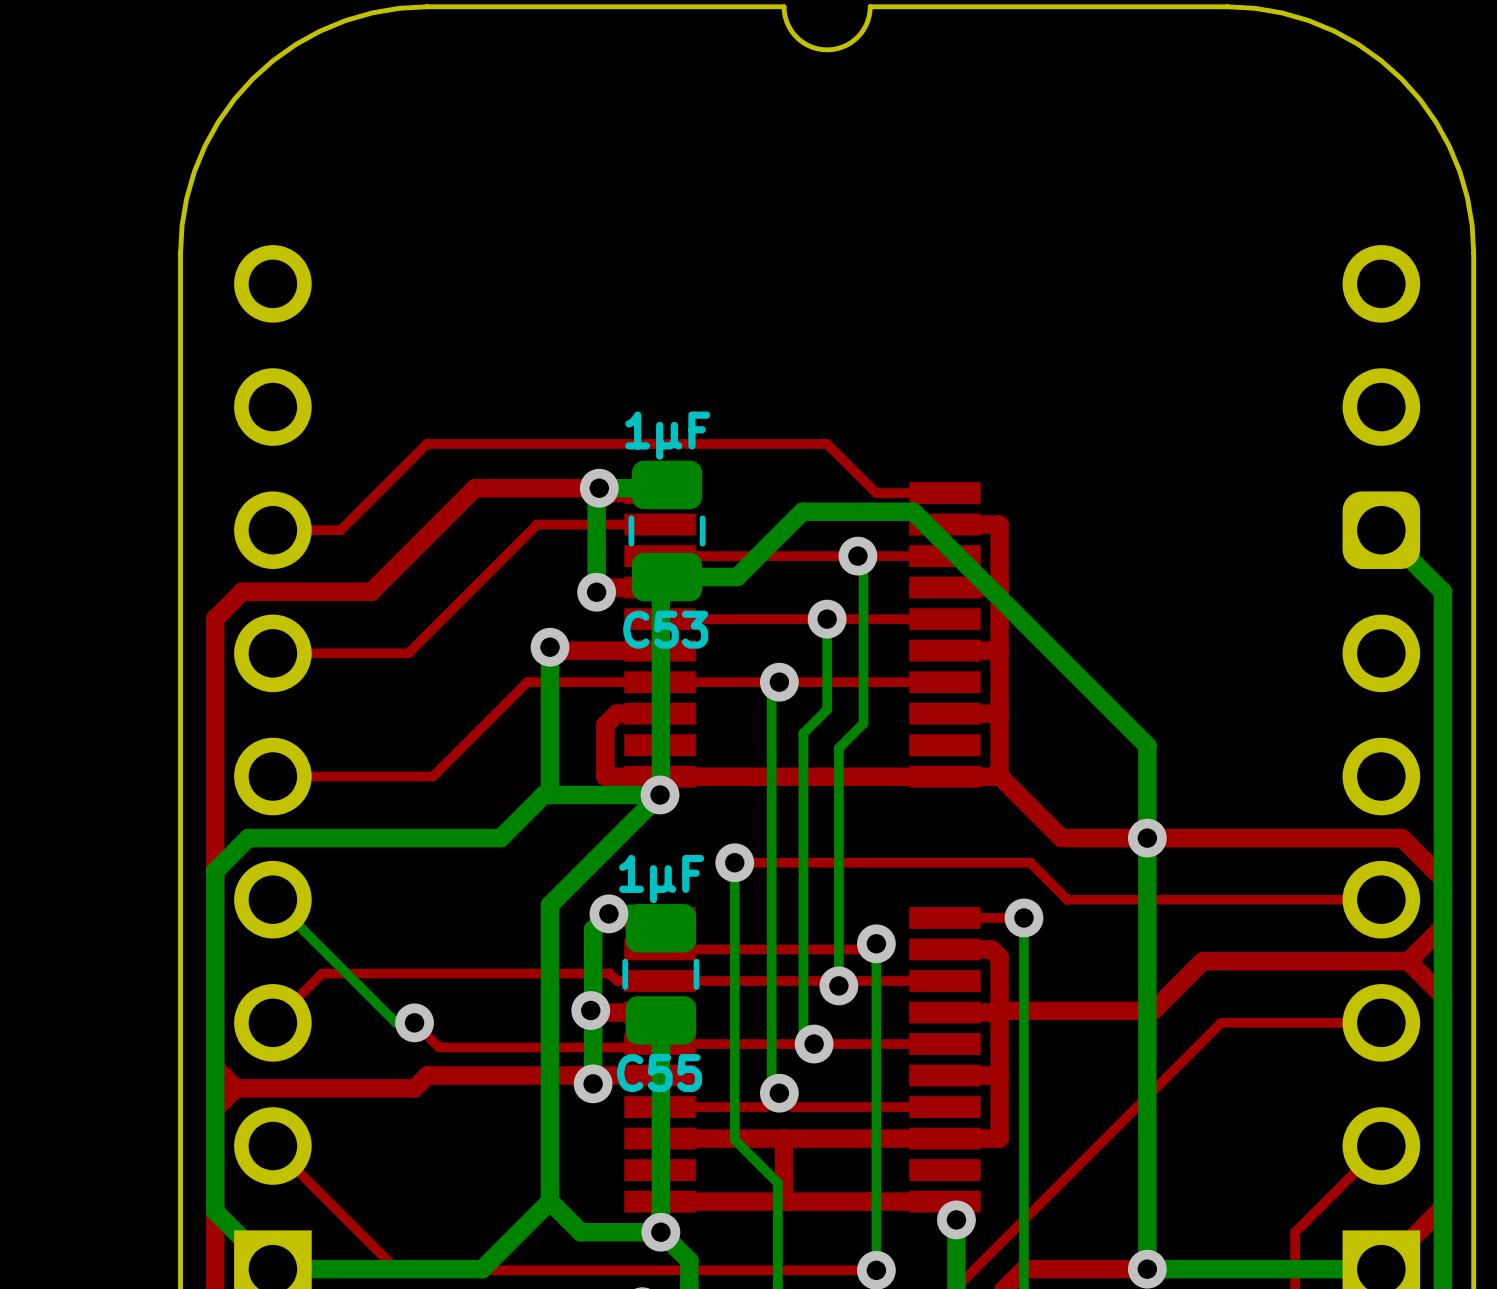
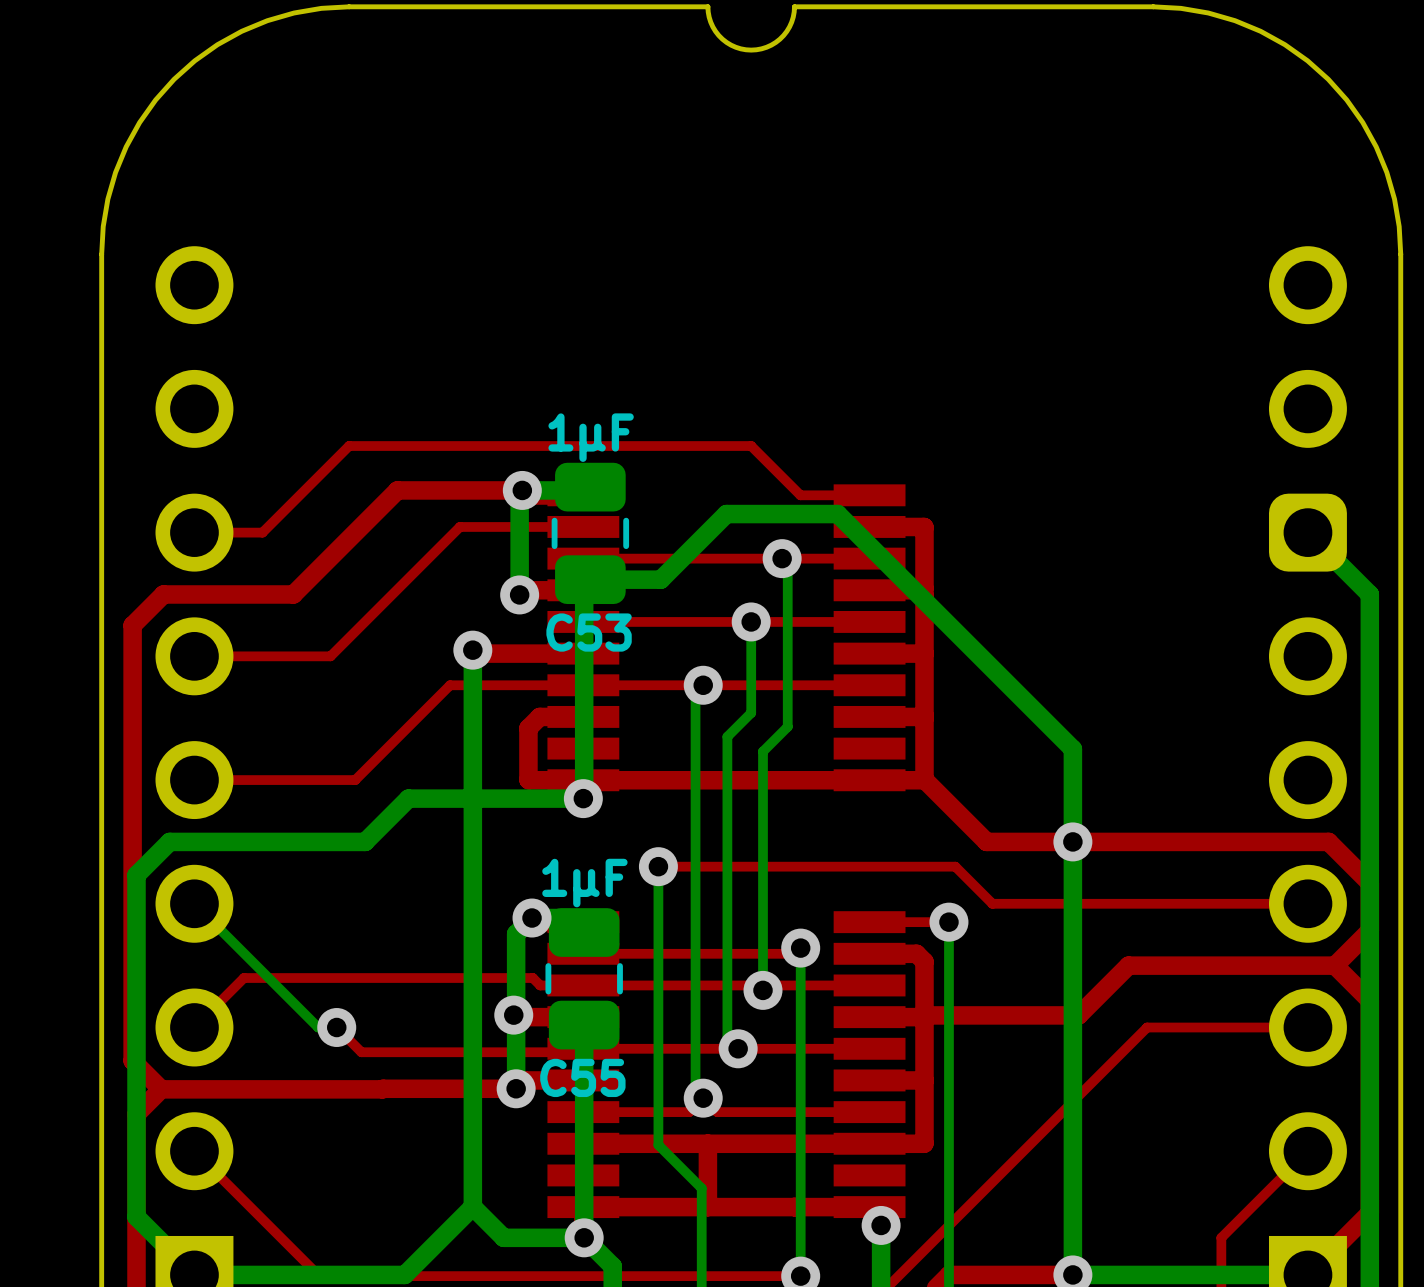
top track: (215, 618) (215, 1067) (235, 1088) (414, 1088) (427, 1075) (584, 1075) (593, 1083) -> (136, 621) (132, 625) (132, 1060) (161, 1089) (382, 1089)
bottom track: (543, 795) (500, 838) (442, 838) -> (466, 798) (408, 798) (365, 841)
bottom track: (660, 795) (550, 905) -> (472, 798) (472, 909)
top track: none -> (516, 1088) (383, 1088)

